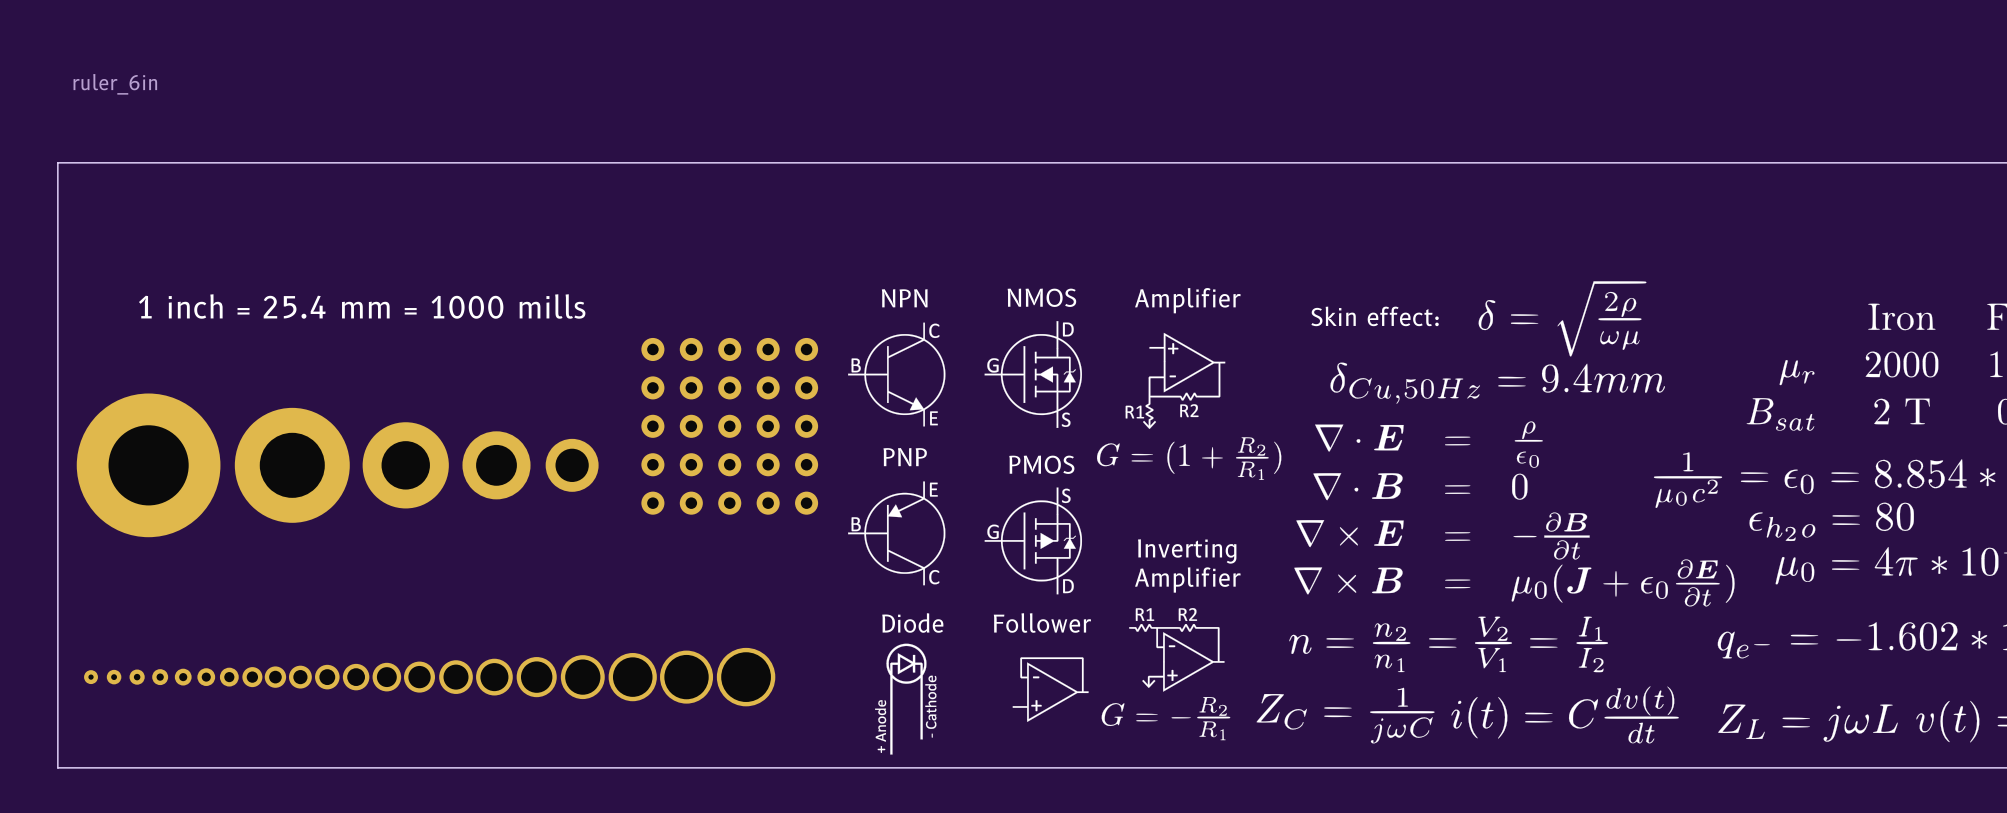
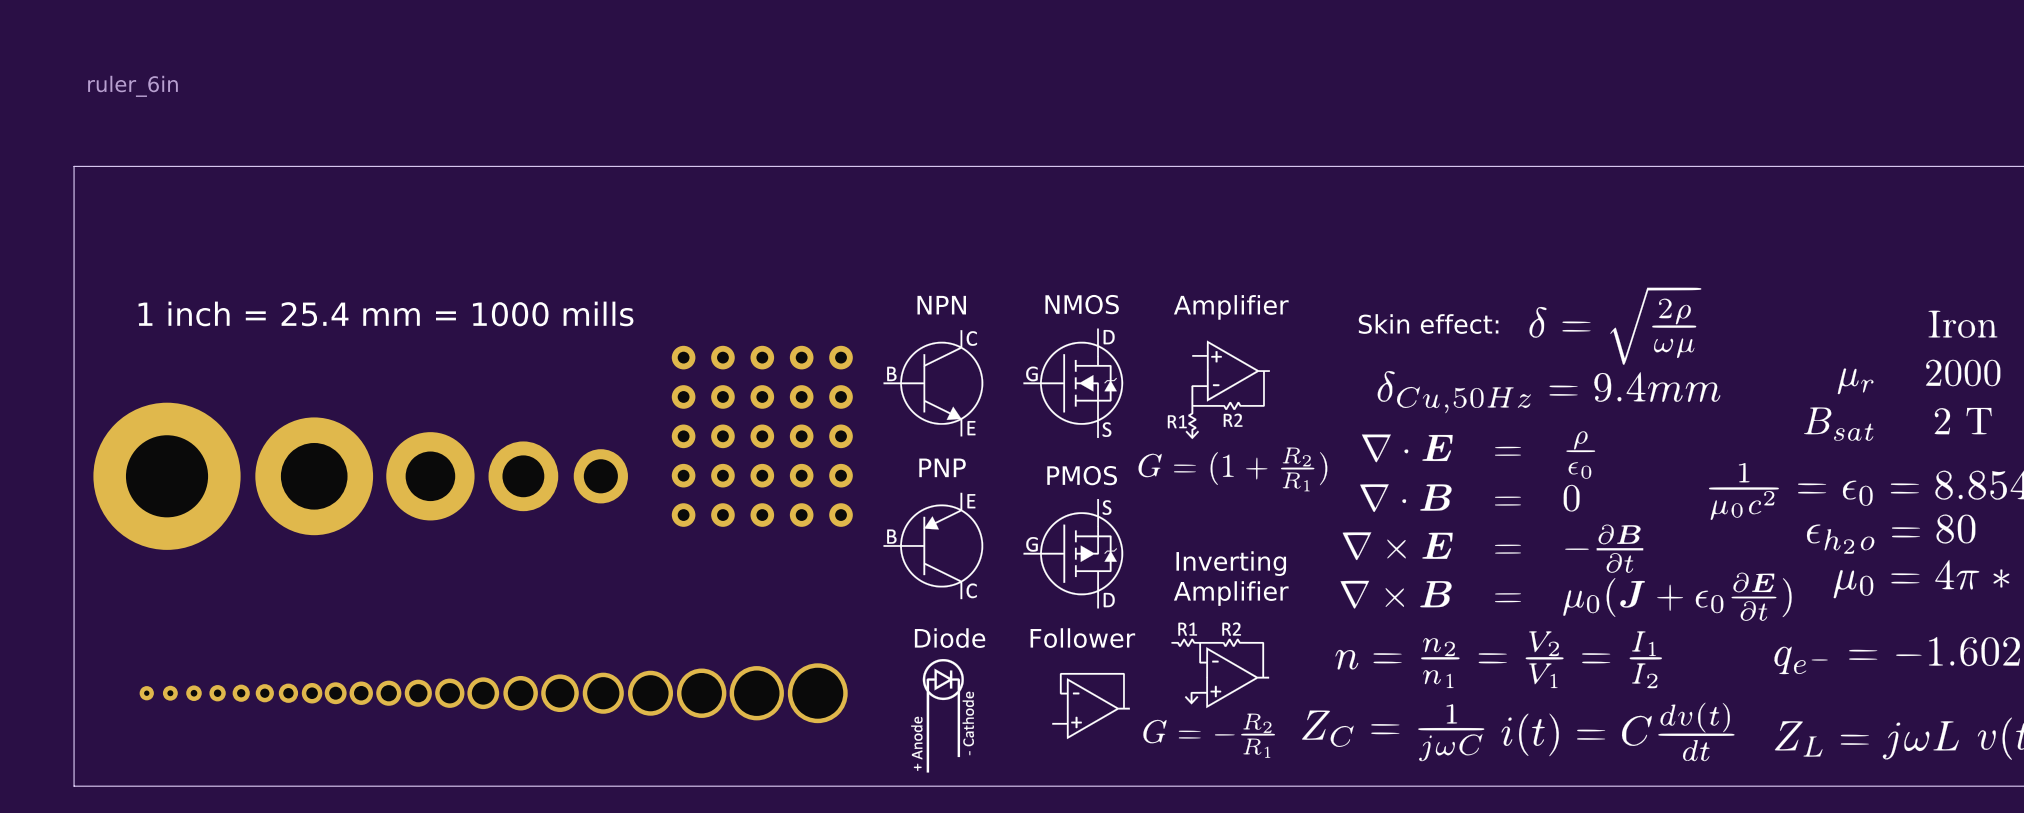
part position: (429, 677) -> (493, 693)

